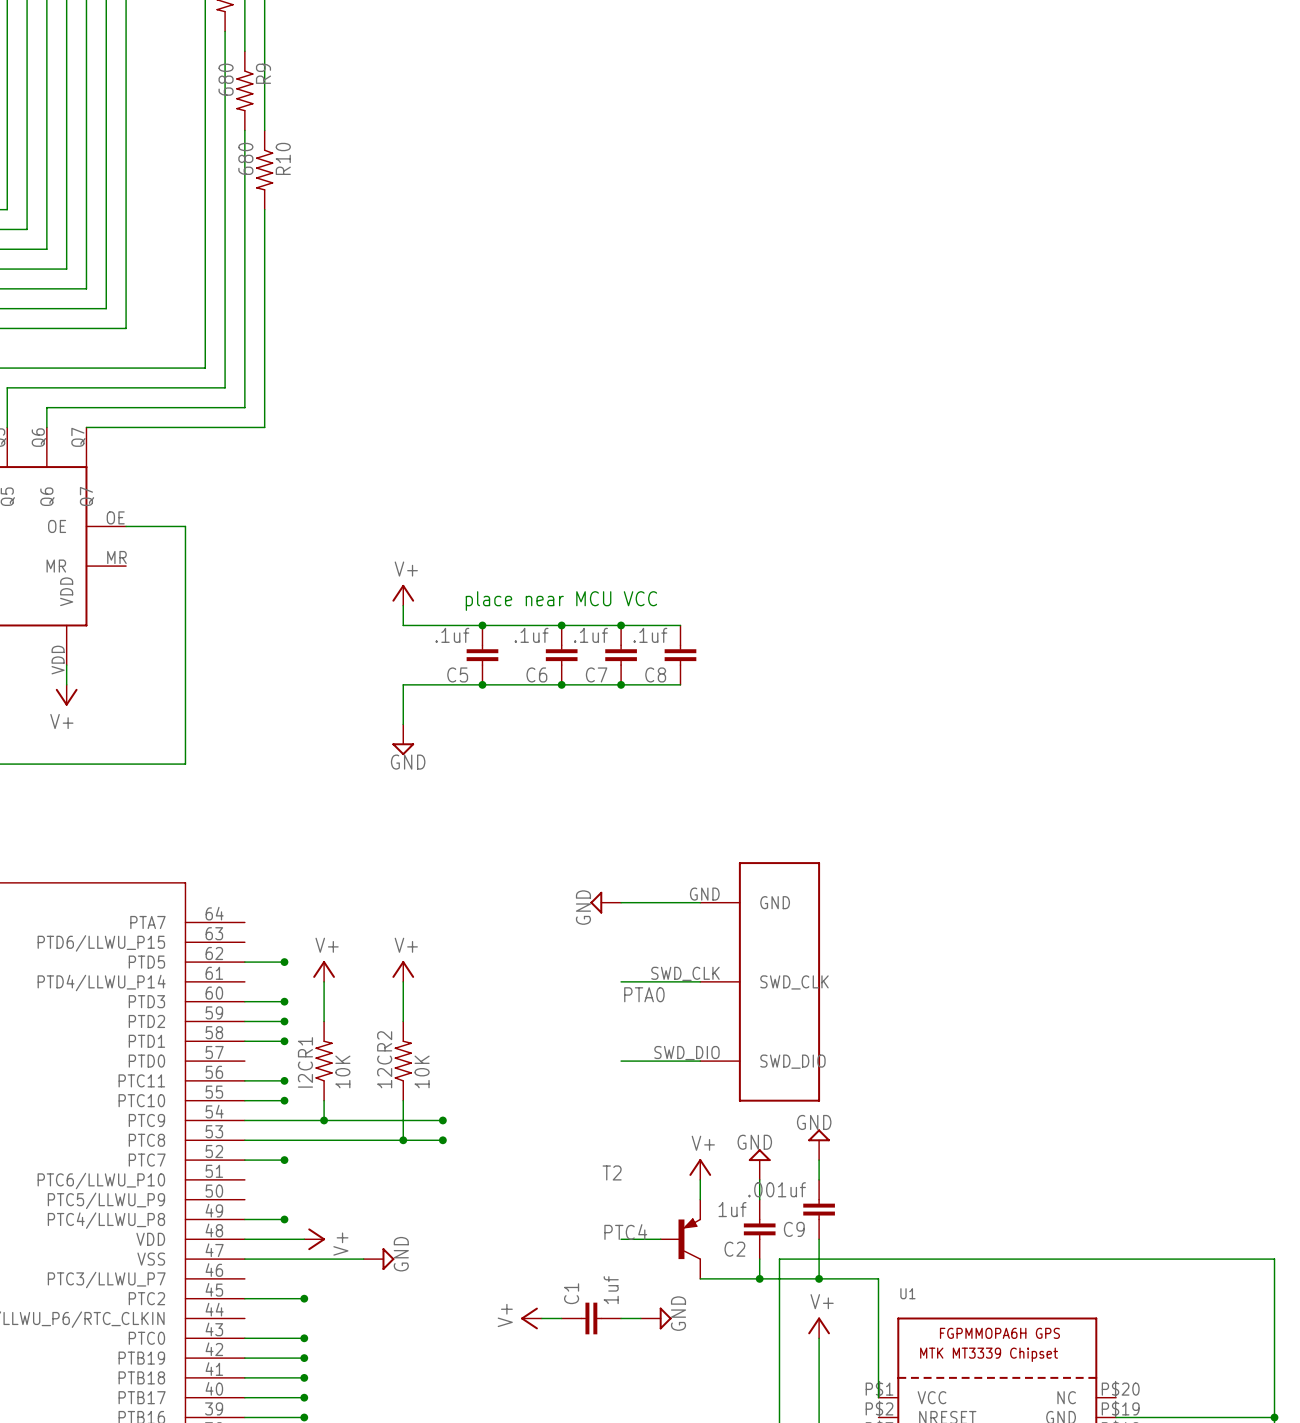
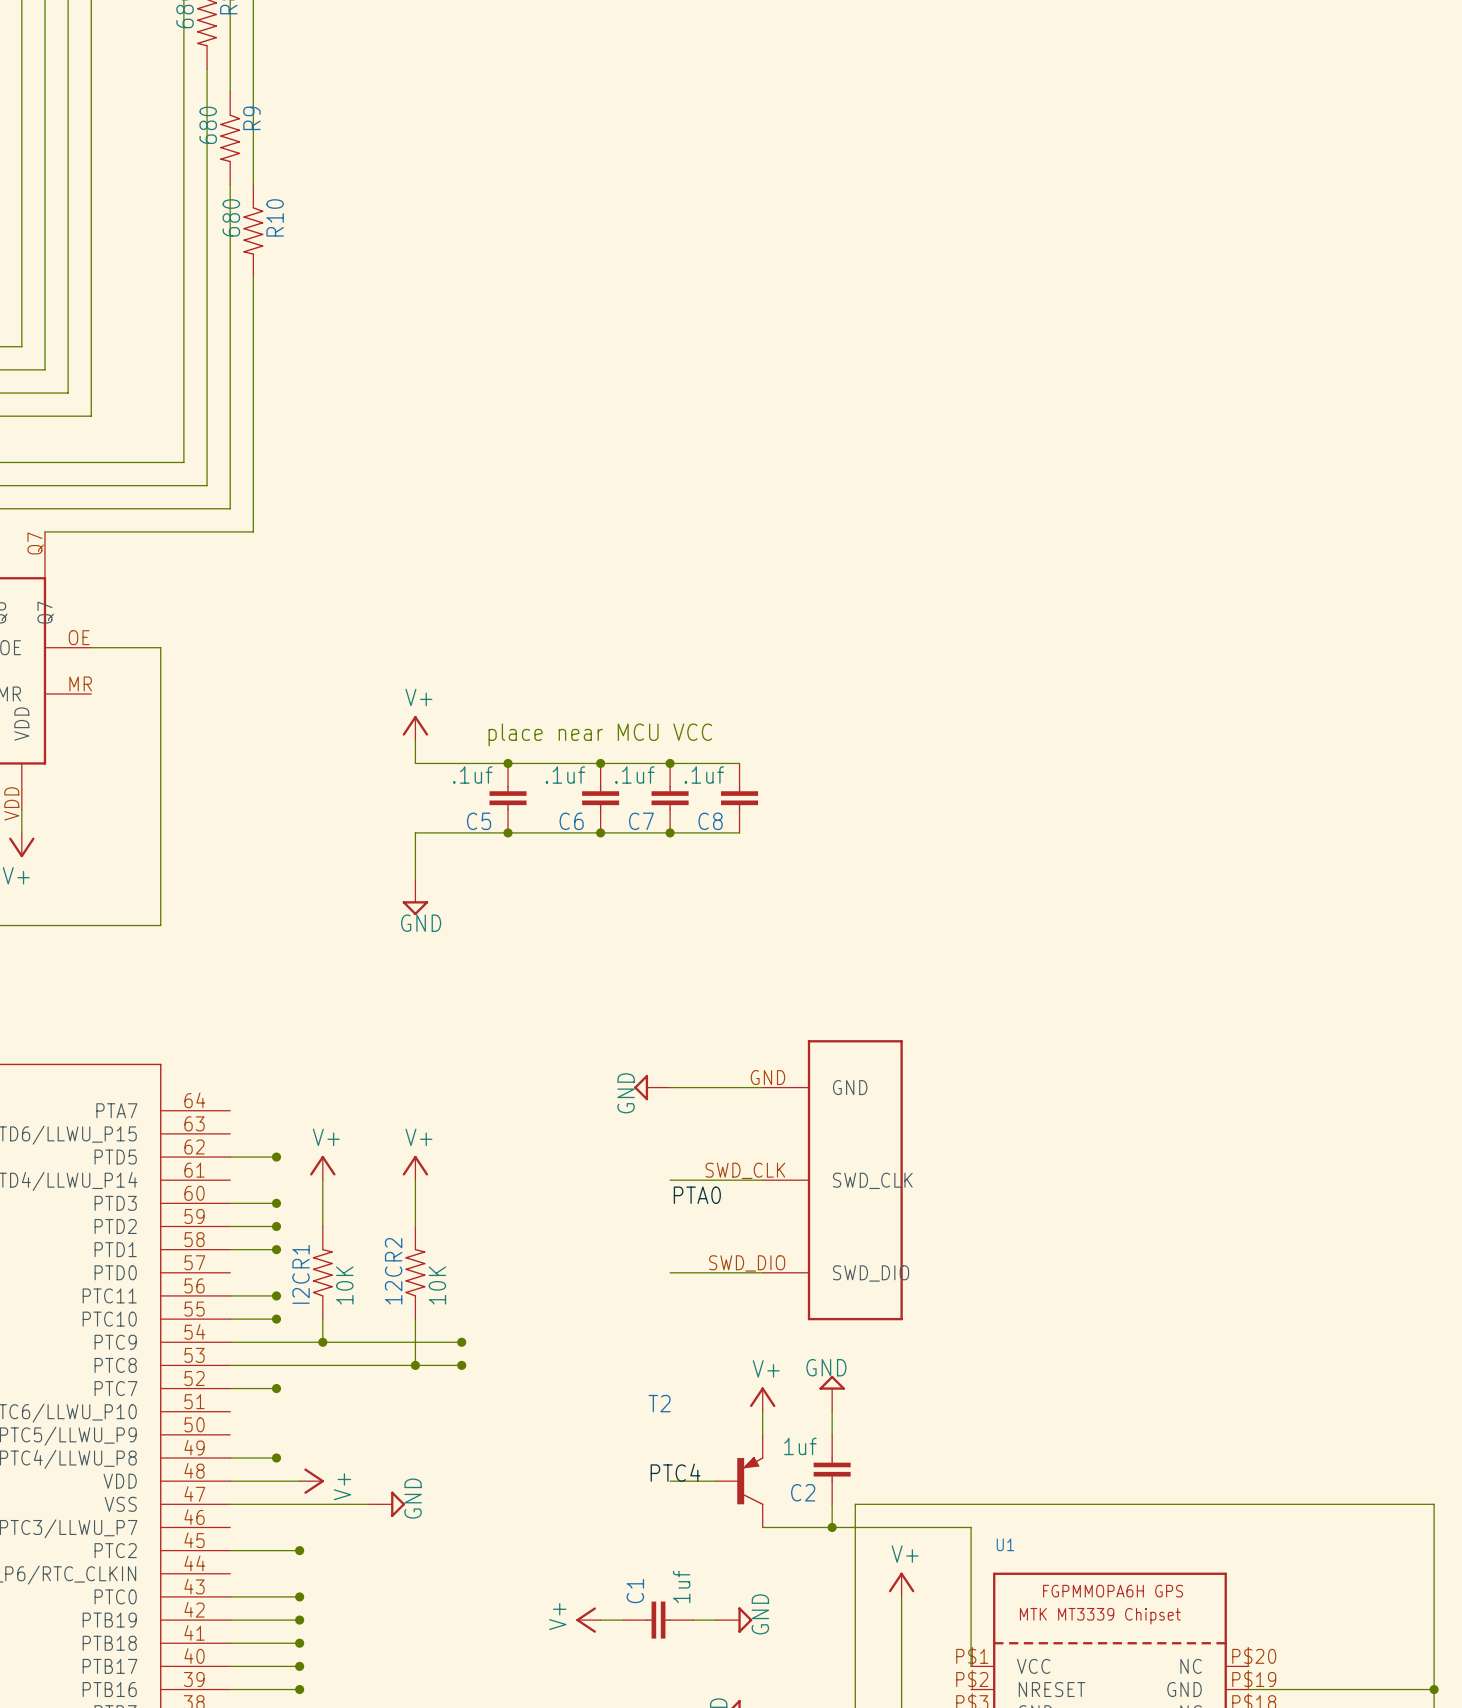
power symbol: GND (819, 1144) -> none
wire: (819, 1160) (819, 1179) -> none
C9: .001uf (819, 1209) -> none
wire: (819, 1239) (819, 1278) -> none
junction: (819, 1278) -> none
power symbol position: V+ (531, 1318) -> V+ (588, 1620)
wire: (541, 1318) (561, 1318) -> (600, 1620) (623, 1620)
C1 position: (591, 1318) -> (658, 1620)
wire: (621, 1318) (640, 1318) -> (693, 1620) (716, 1620)
power symbol position: GND (656, 1318) -> GND (734, 1620)

